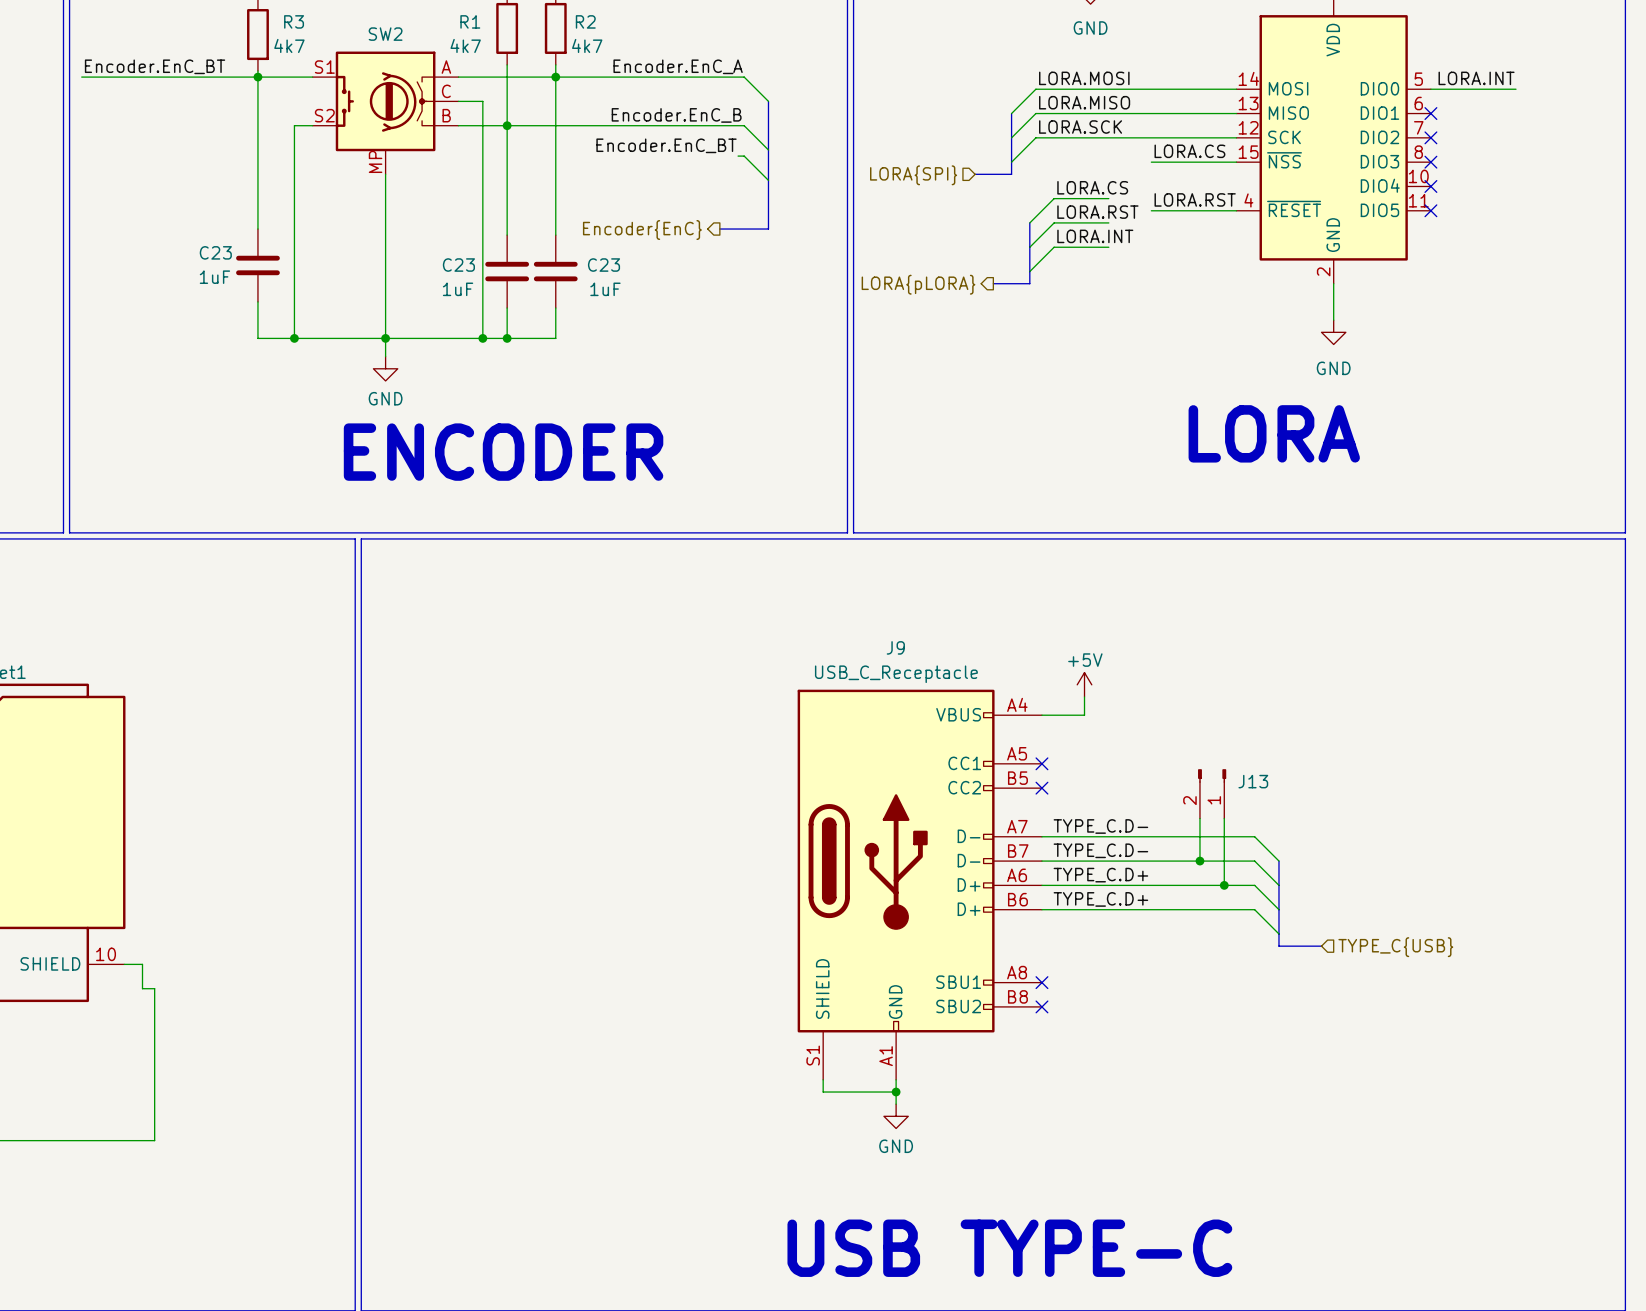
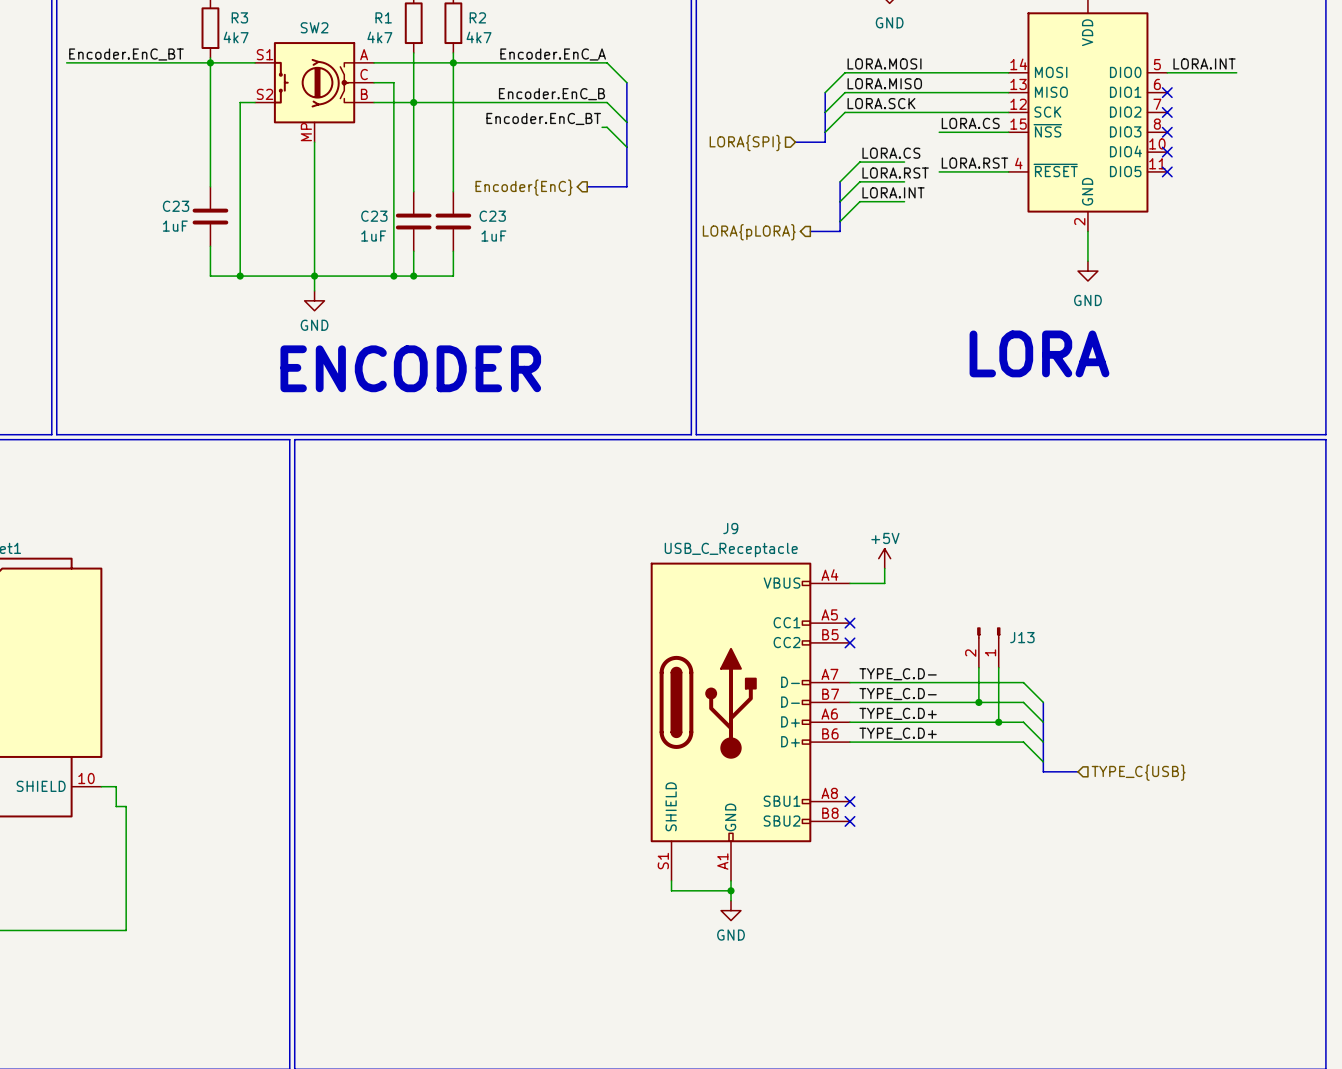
text: USB TYPE-C (1009, 1248) -> none

